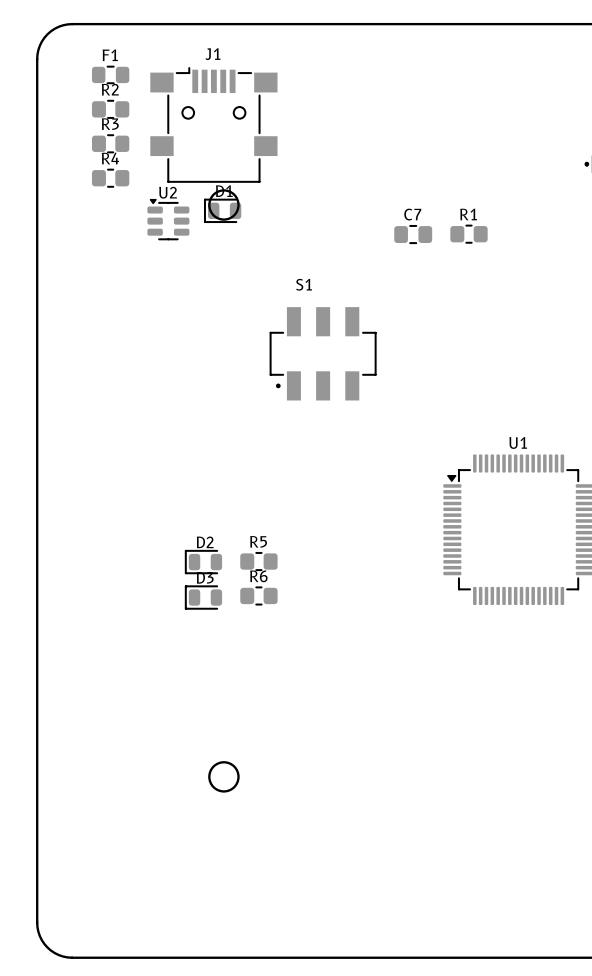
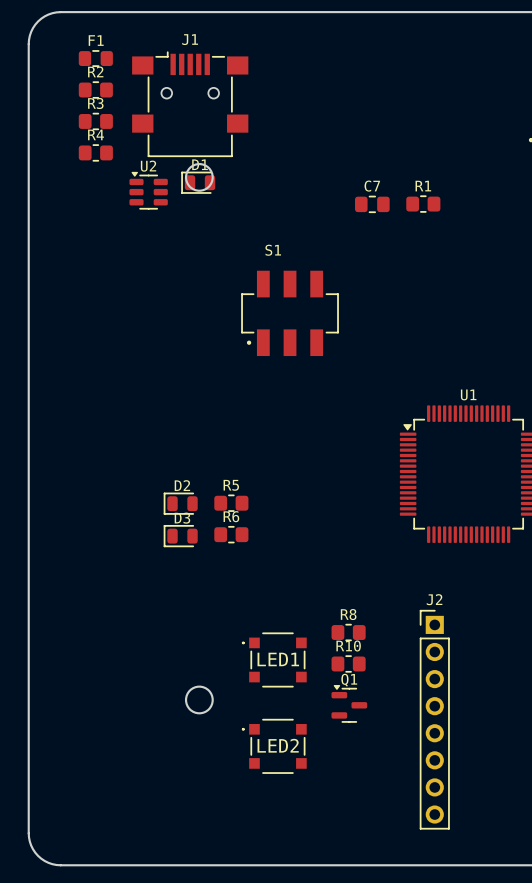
R8: none -> (348, 632)
LED1: none -> (274, 659)
R10: none -> (348, 663)
Q1: none -> (349, 703)
J2: none -> (434, 719)
LED2: none -> (274, 746)

